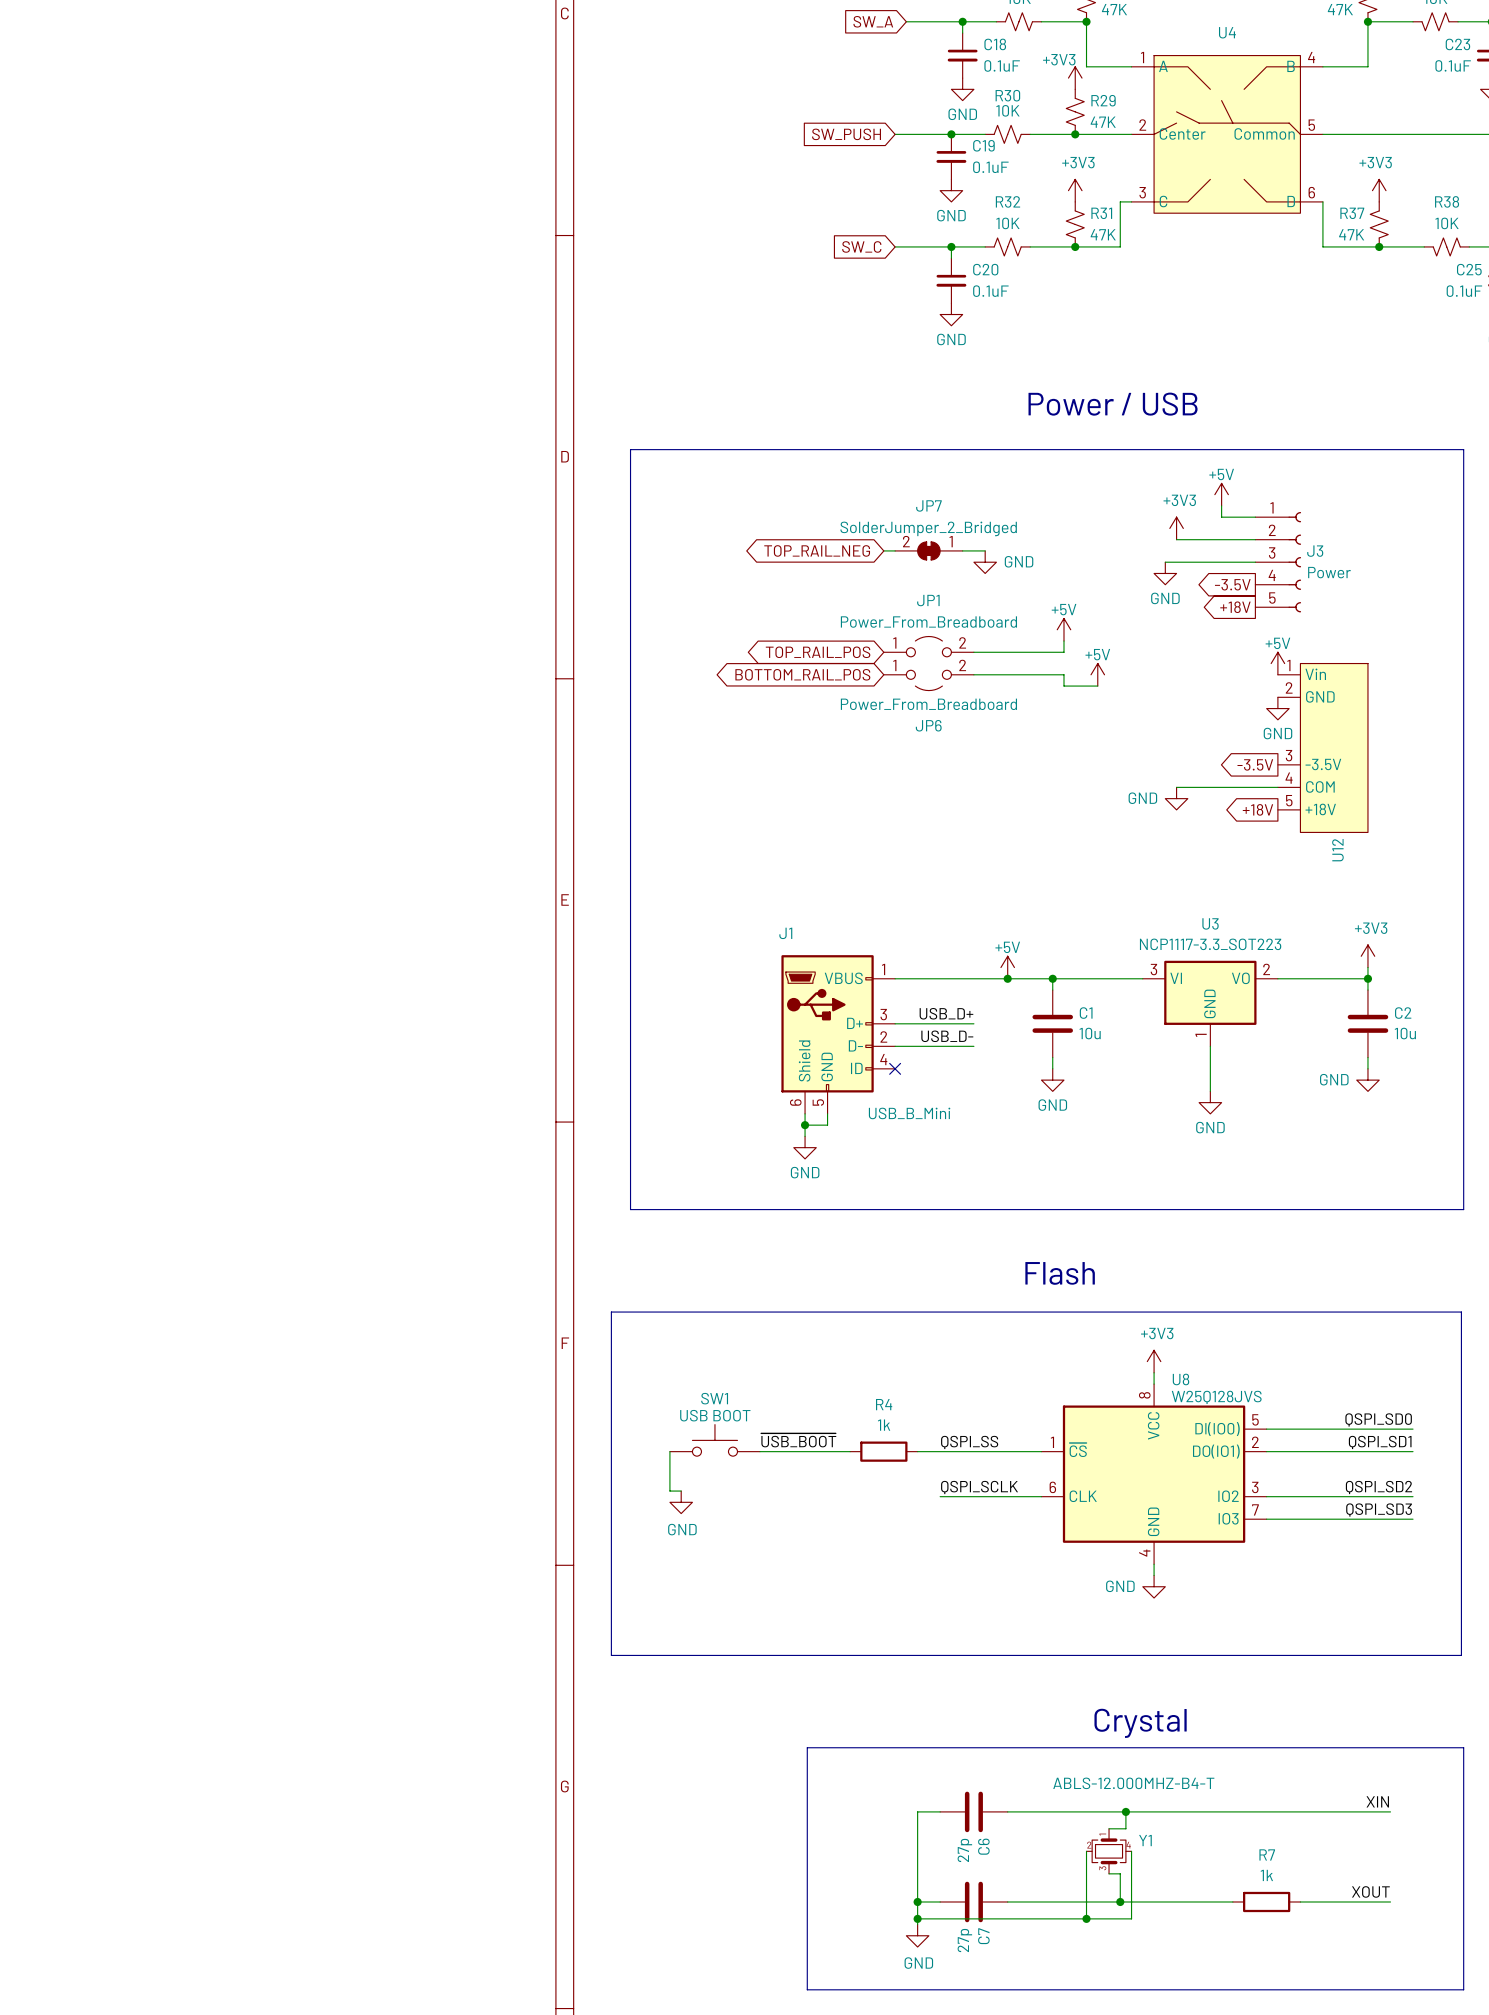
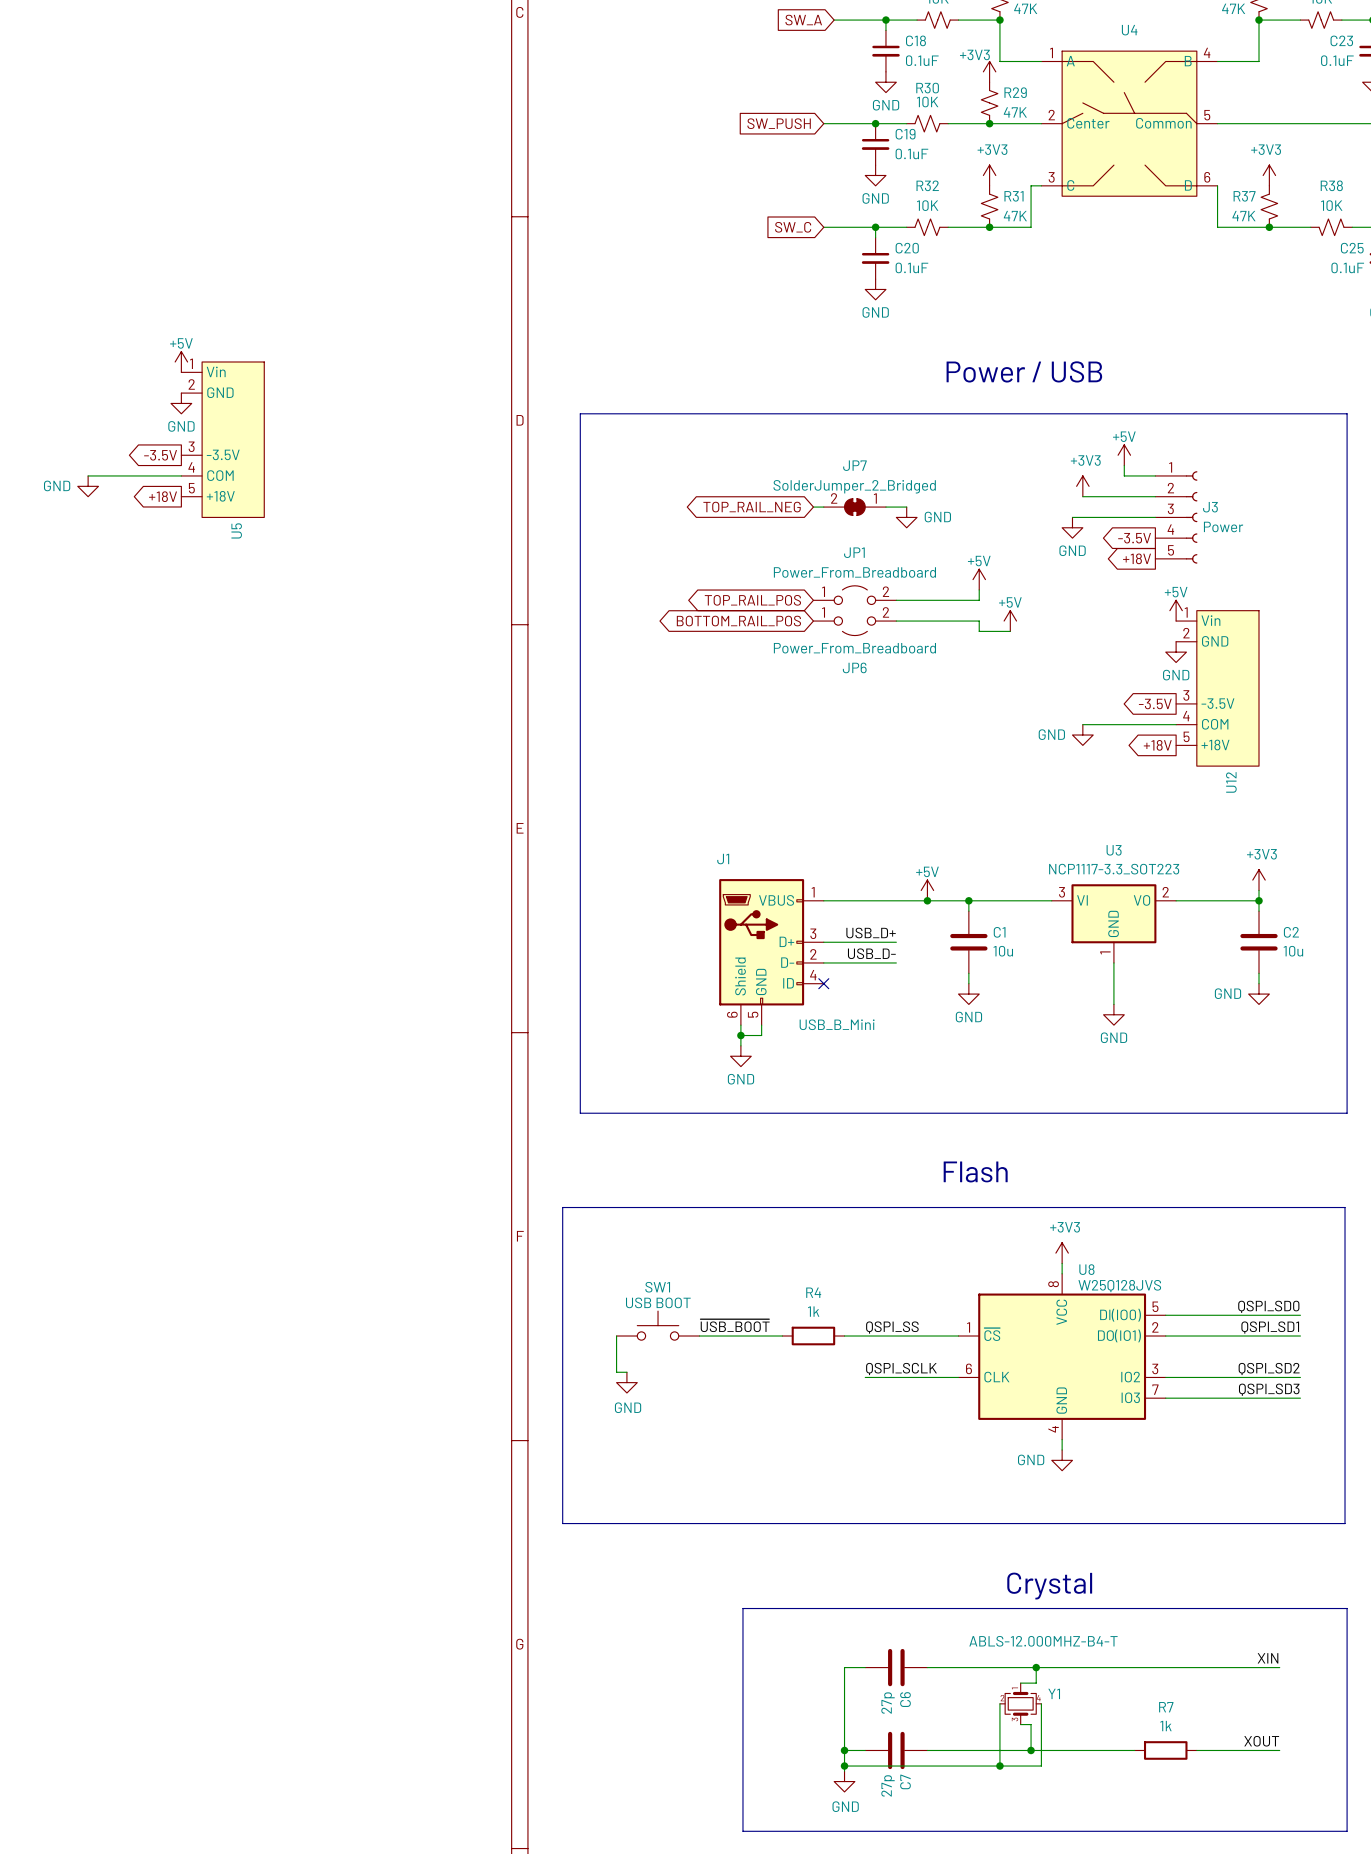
power symbol: none -> +5V (181, 361)
power symbol: none -> GND (181, 403)
U5: none -> (222, 439)
global label: none -> -3.5V (160, 455)
wire: none -> (88, 475) (181, 475)
power symbol: none -> GND (88, 486)
global label: none -> +18V (163, 496)

